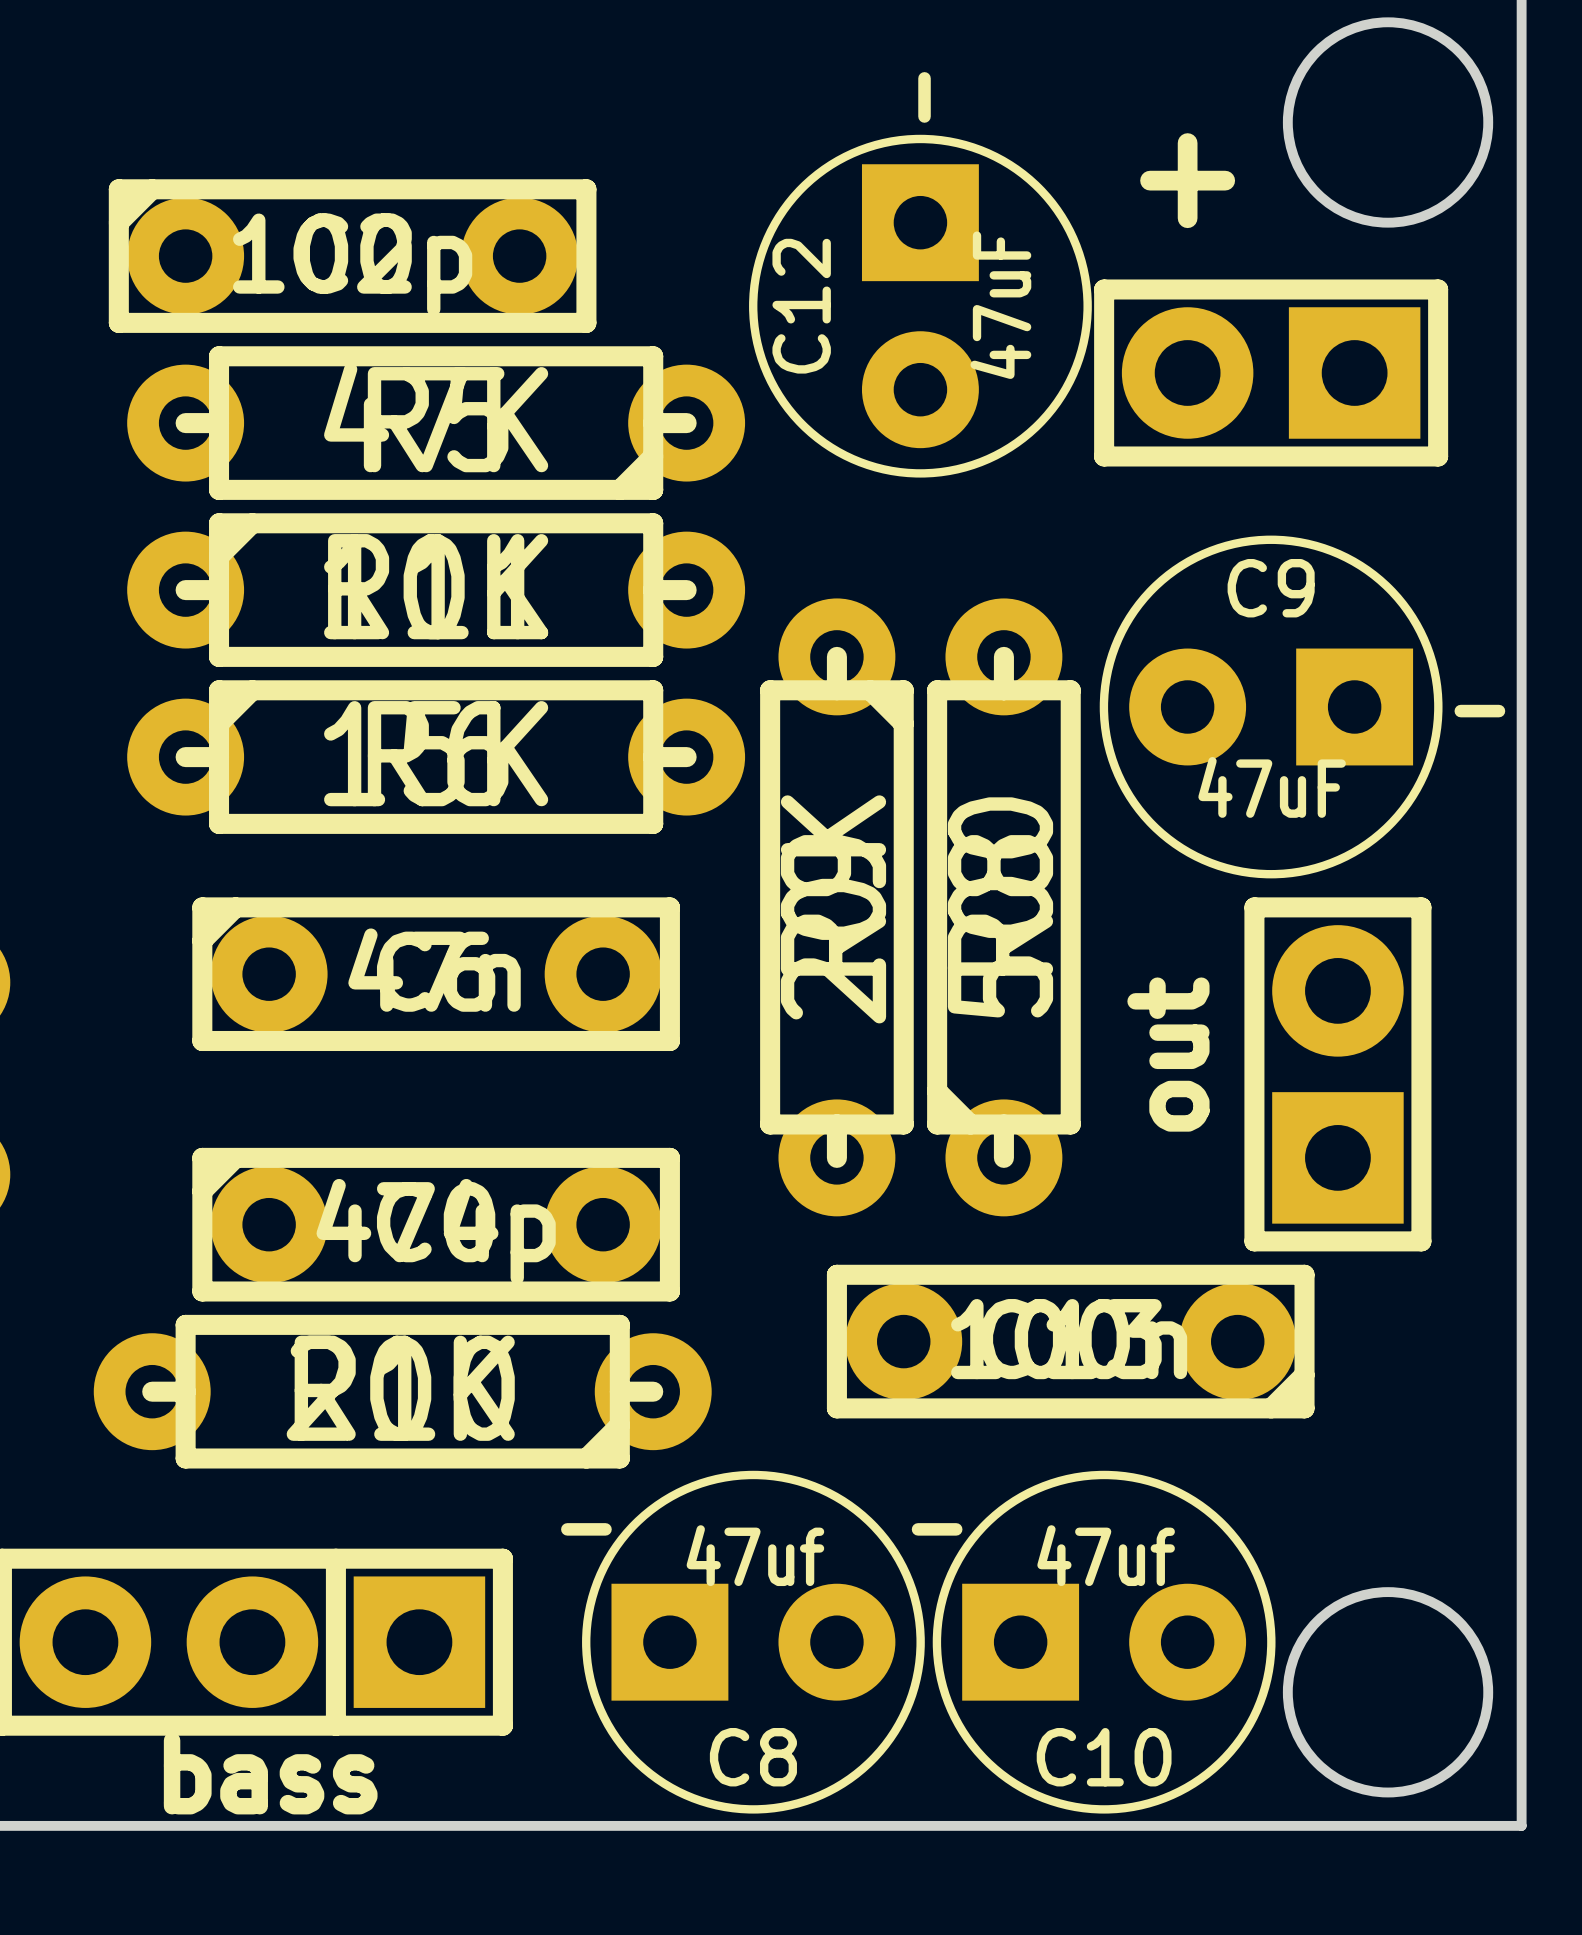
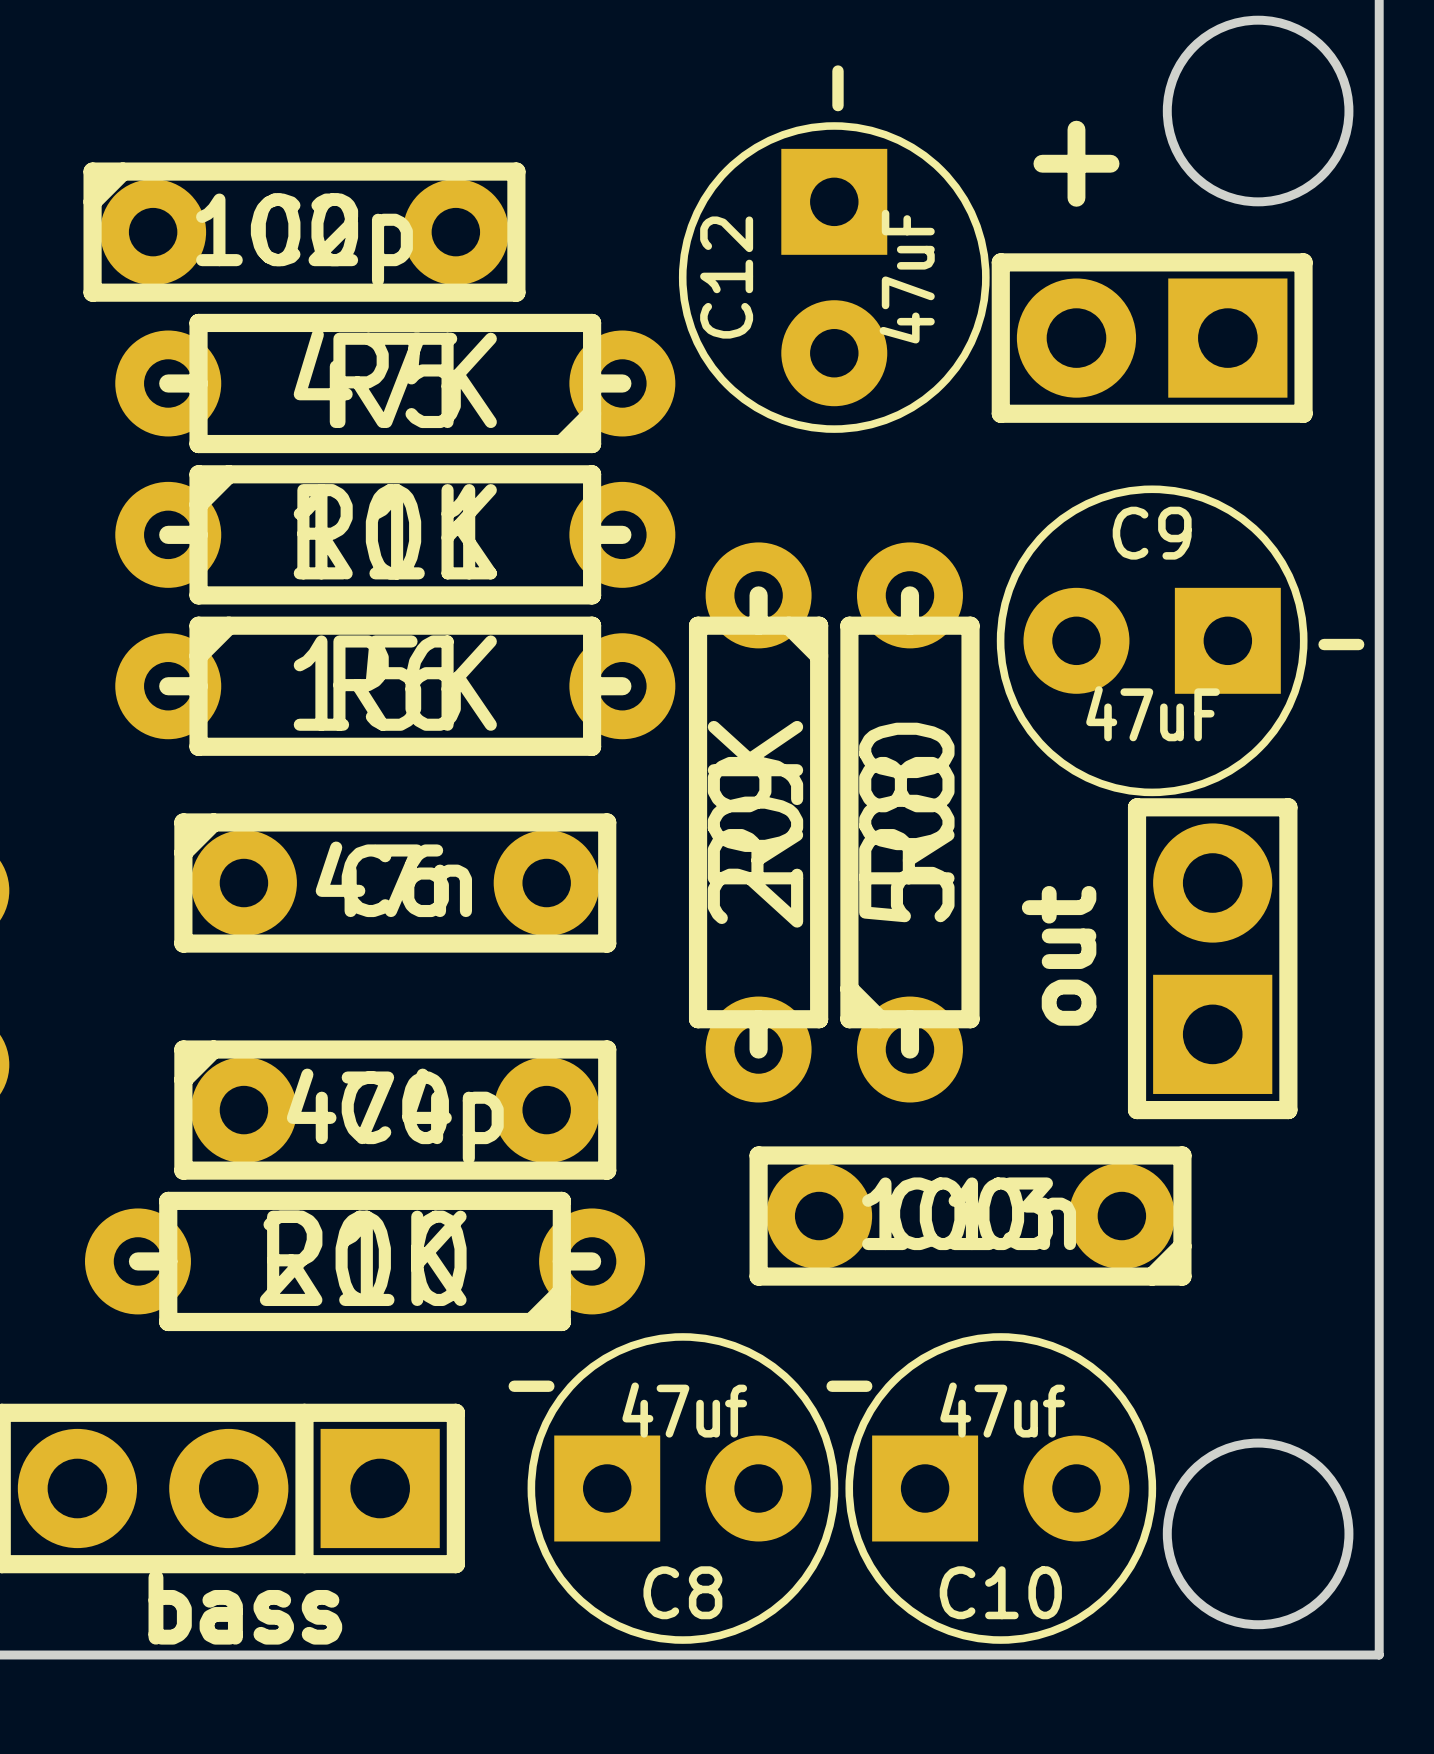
part position: (352, 256) -> (304, 232)
part position: (1337, 1074) -> (1212, 958)

